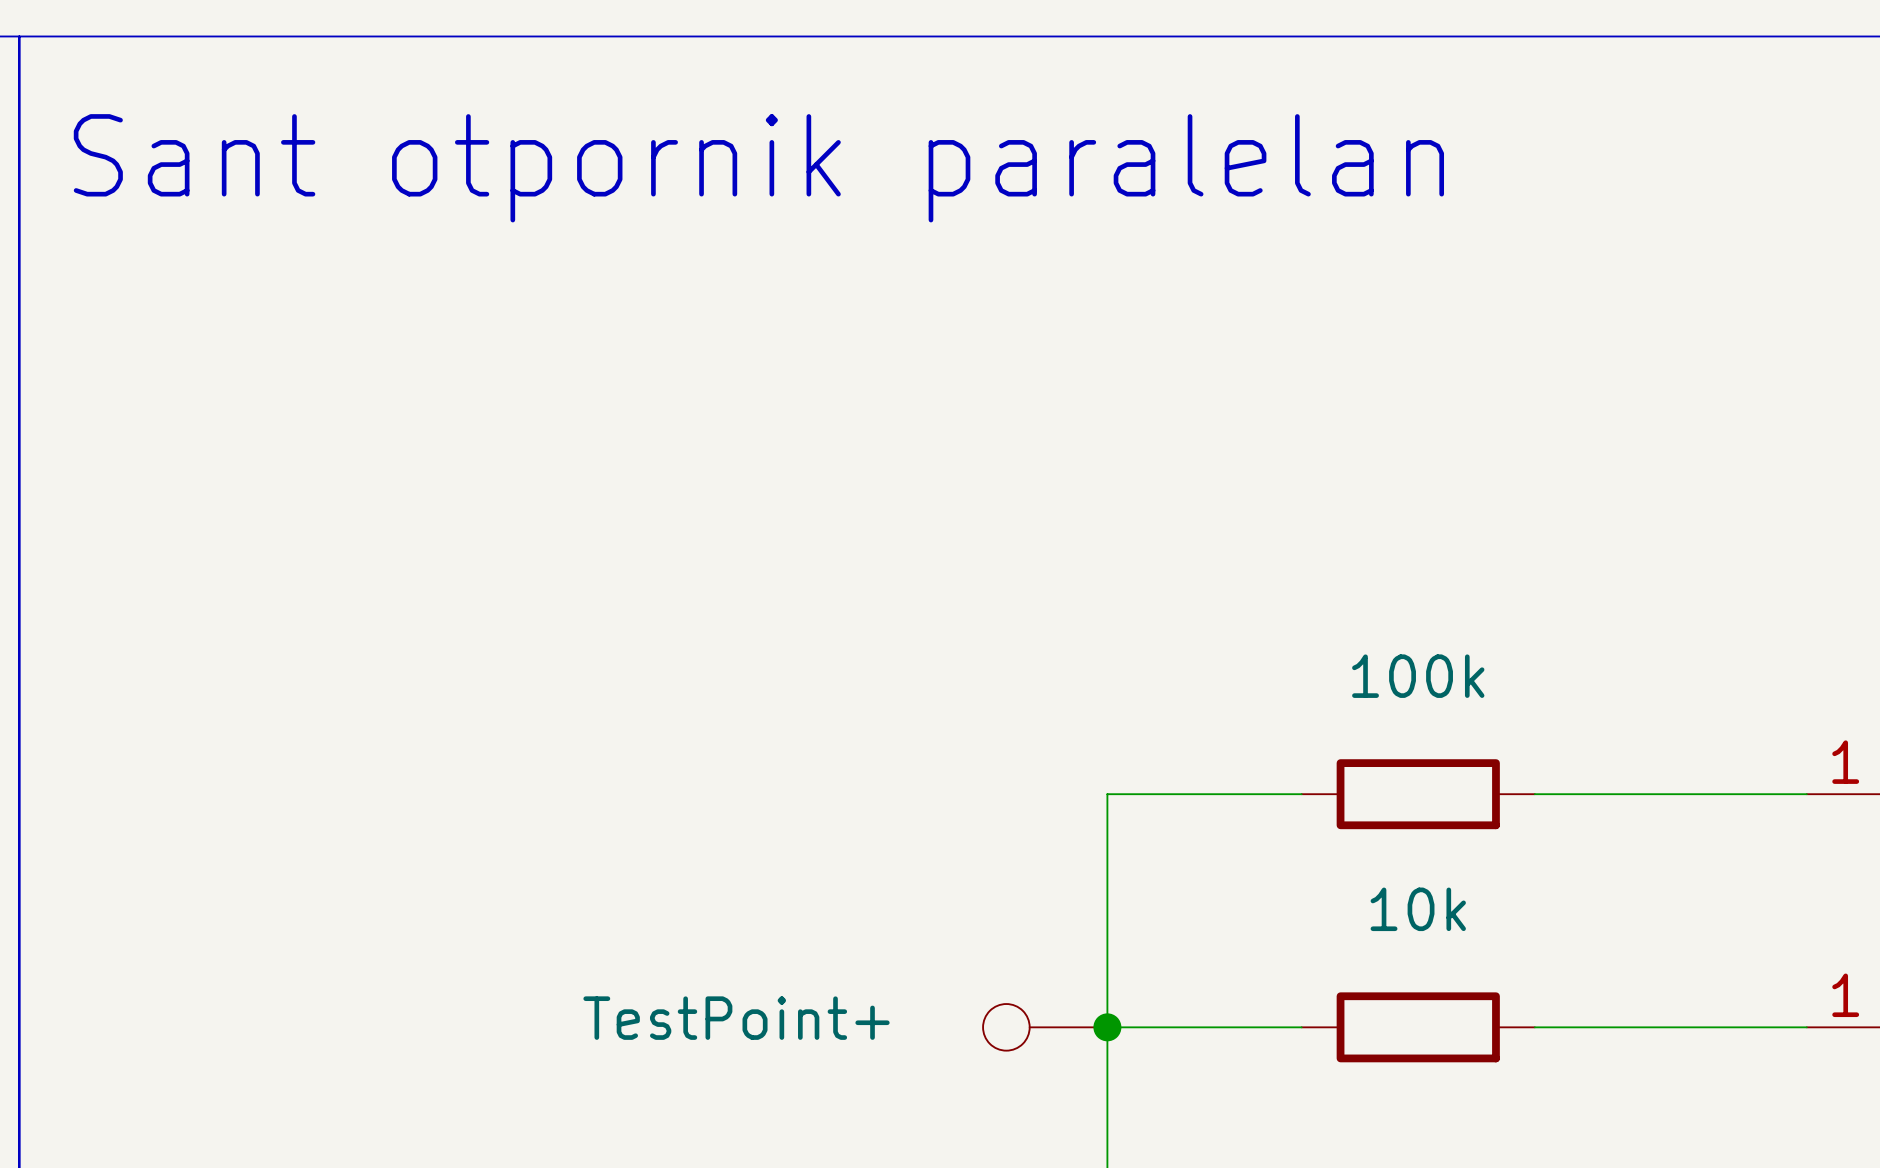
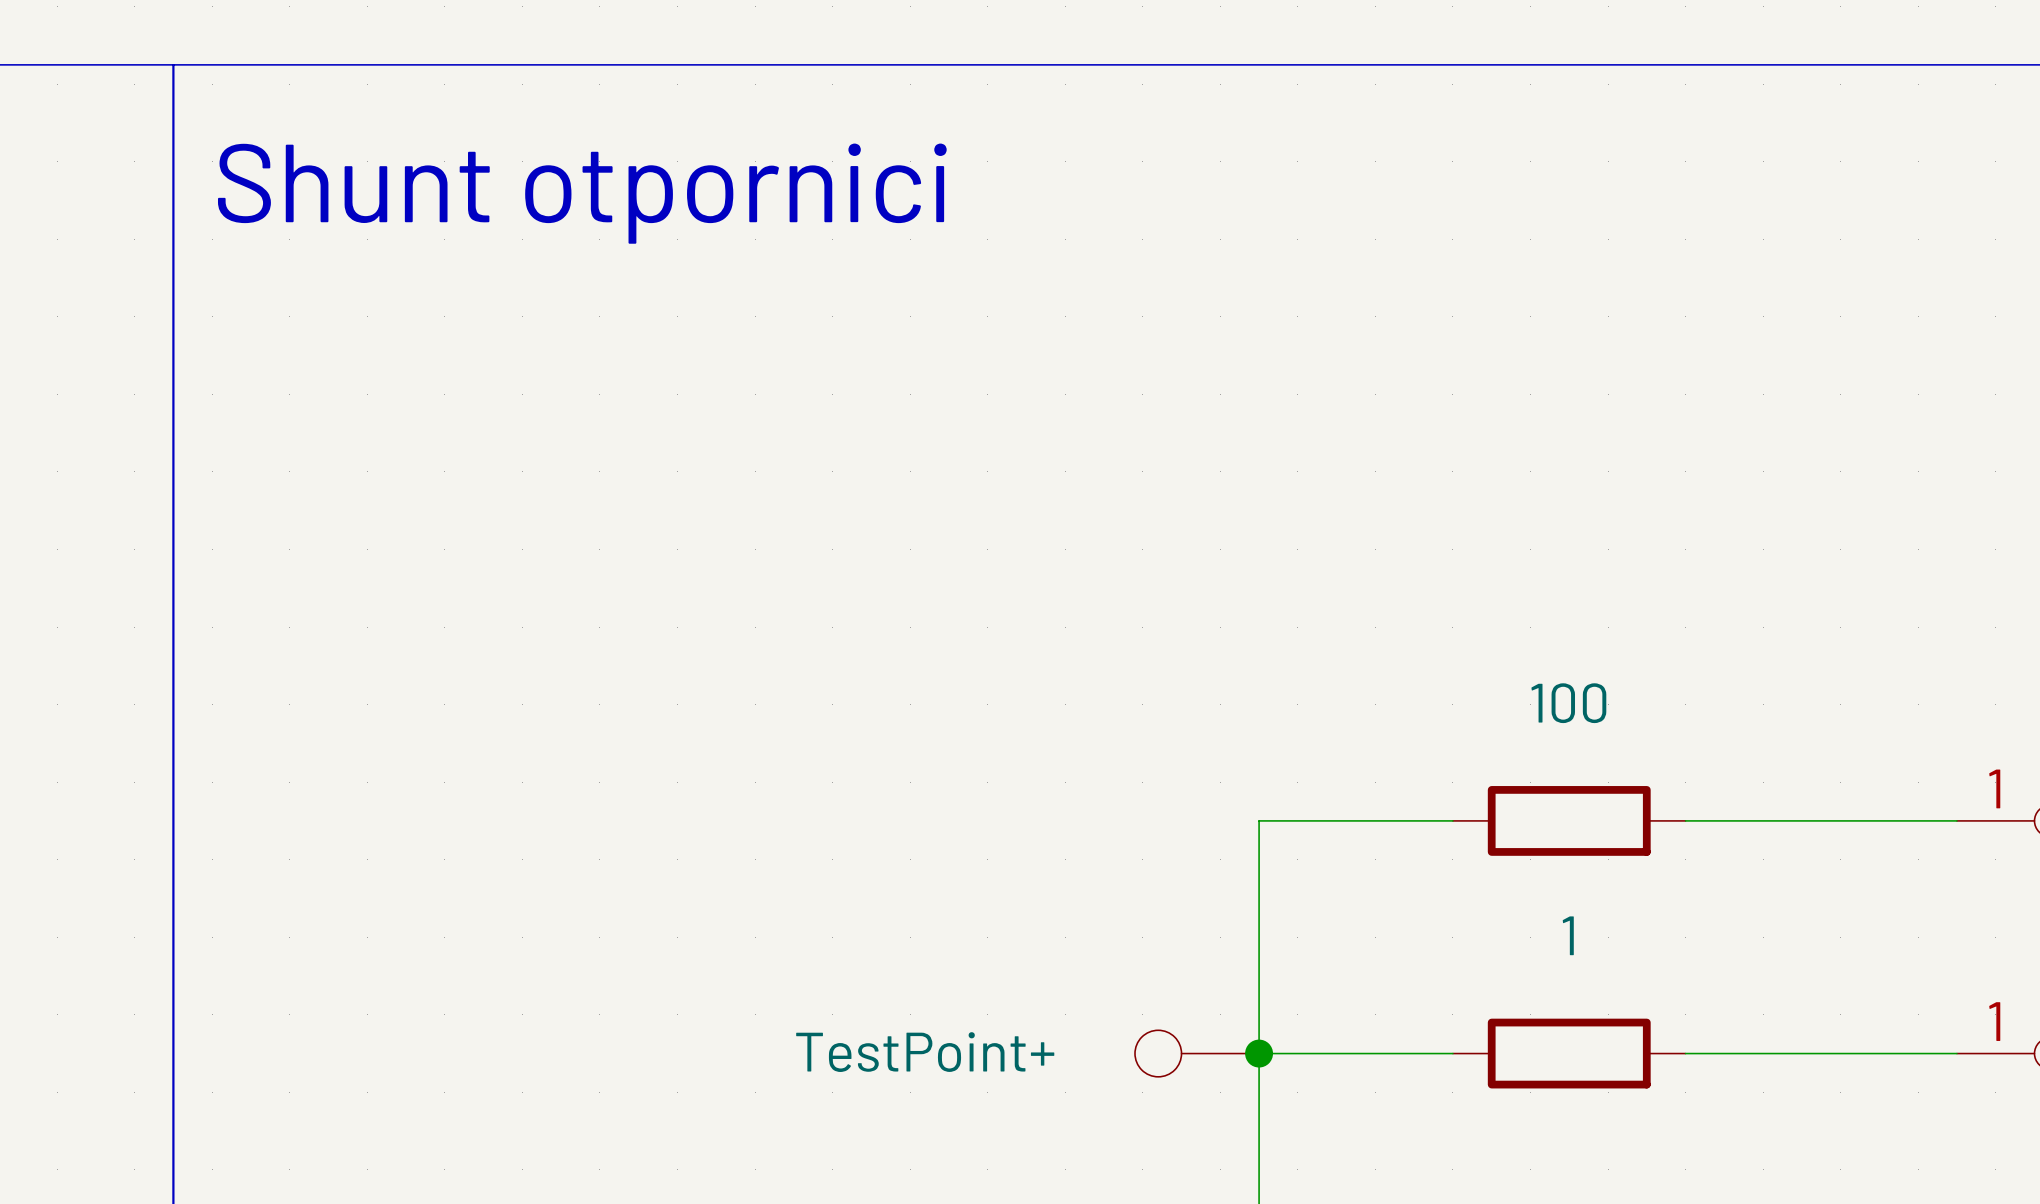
text: Sant otpornik paralelan (758, 168) -> Shunt otpornici (582, 193)
part value: 100k (1418, 676) -> 100 (1568, 703)
part value: 10k (1418, 909) -> 1 (1568, 935)
part value position: TestPoint+ (736, 1018) -> TestPoint+ (925, 1052)

